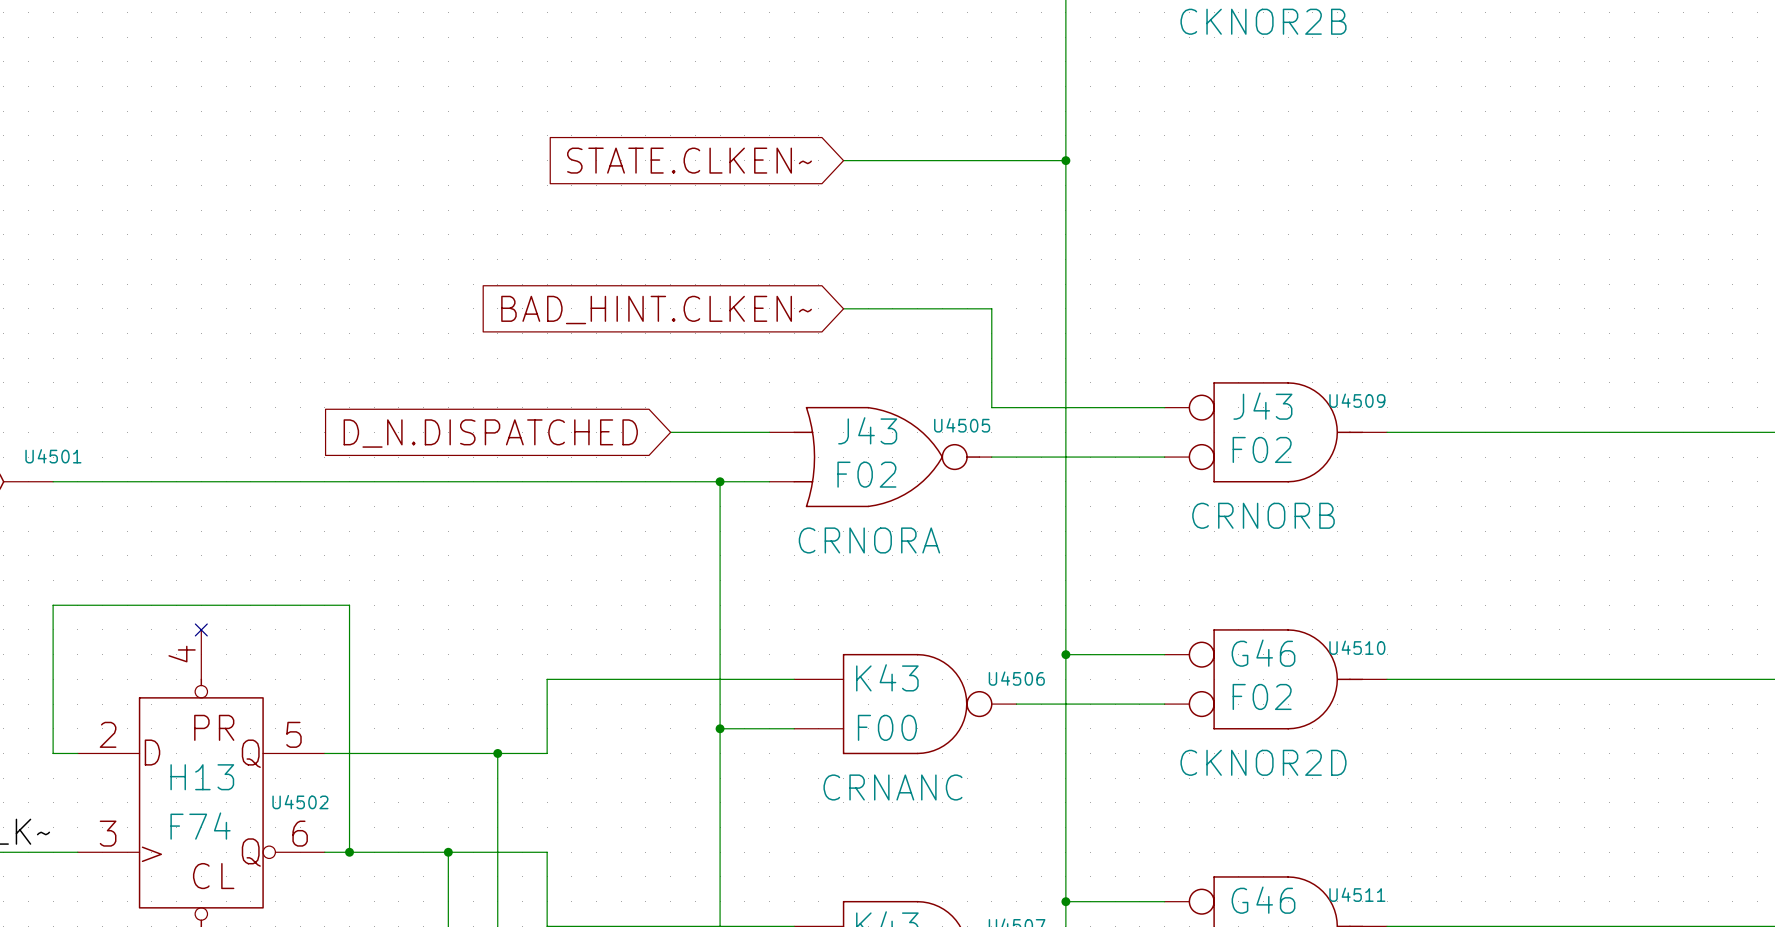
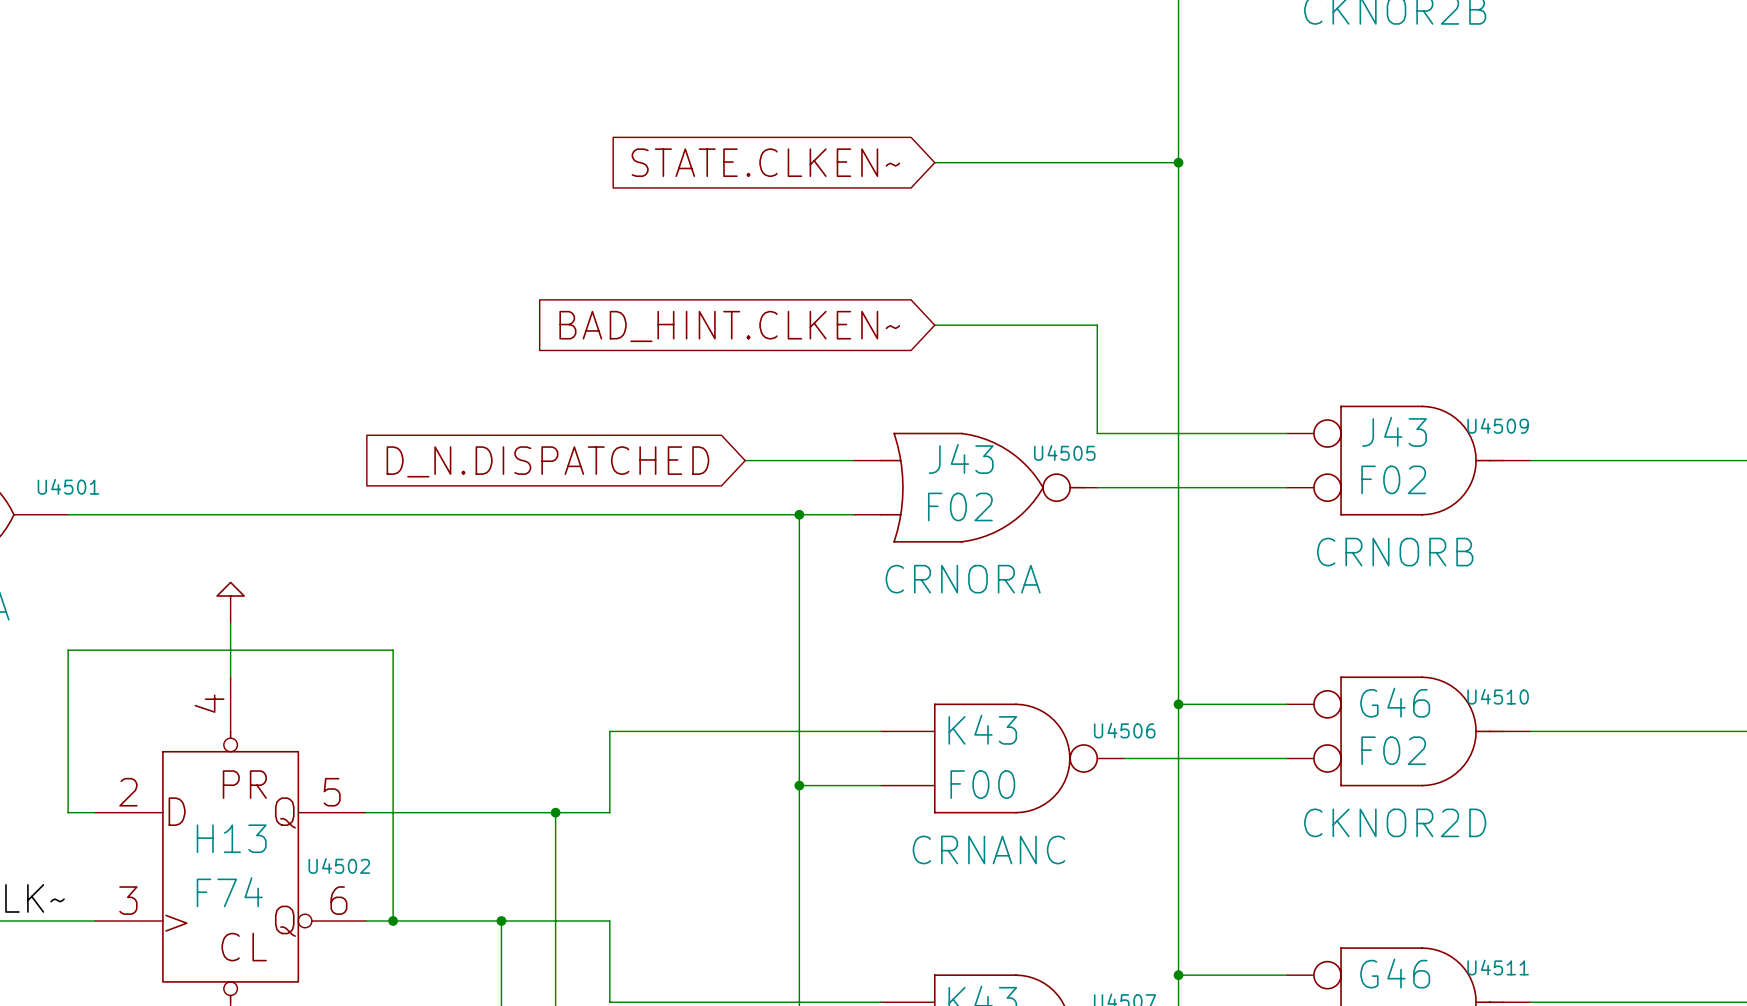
power symbol: none -> (230, 602)
wire: none -> (230, 623) (230, 677)
no-connect mark: (201, 629) -> none

